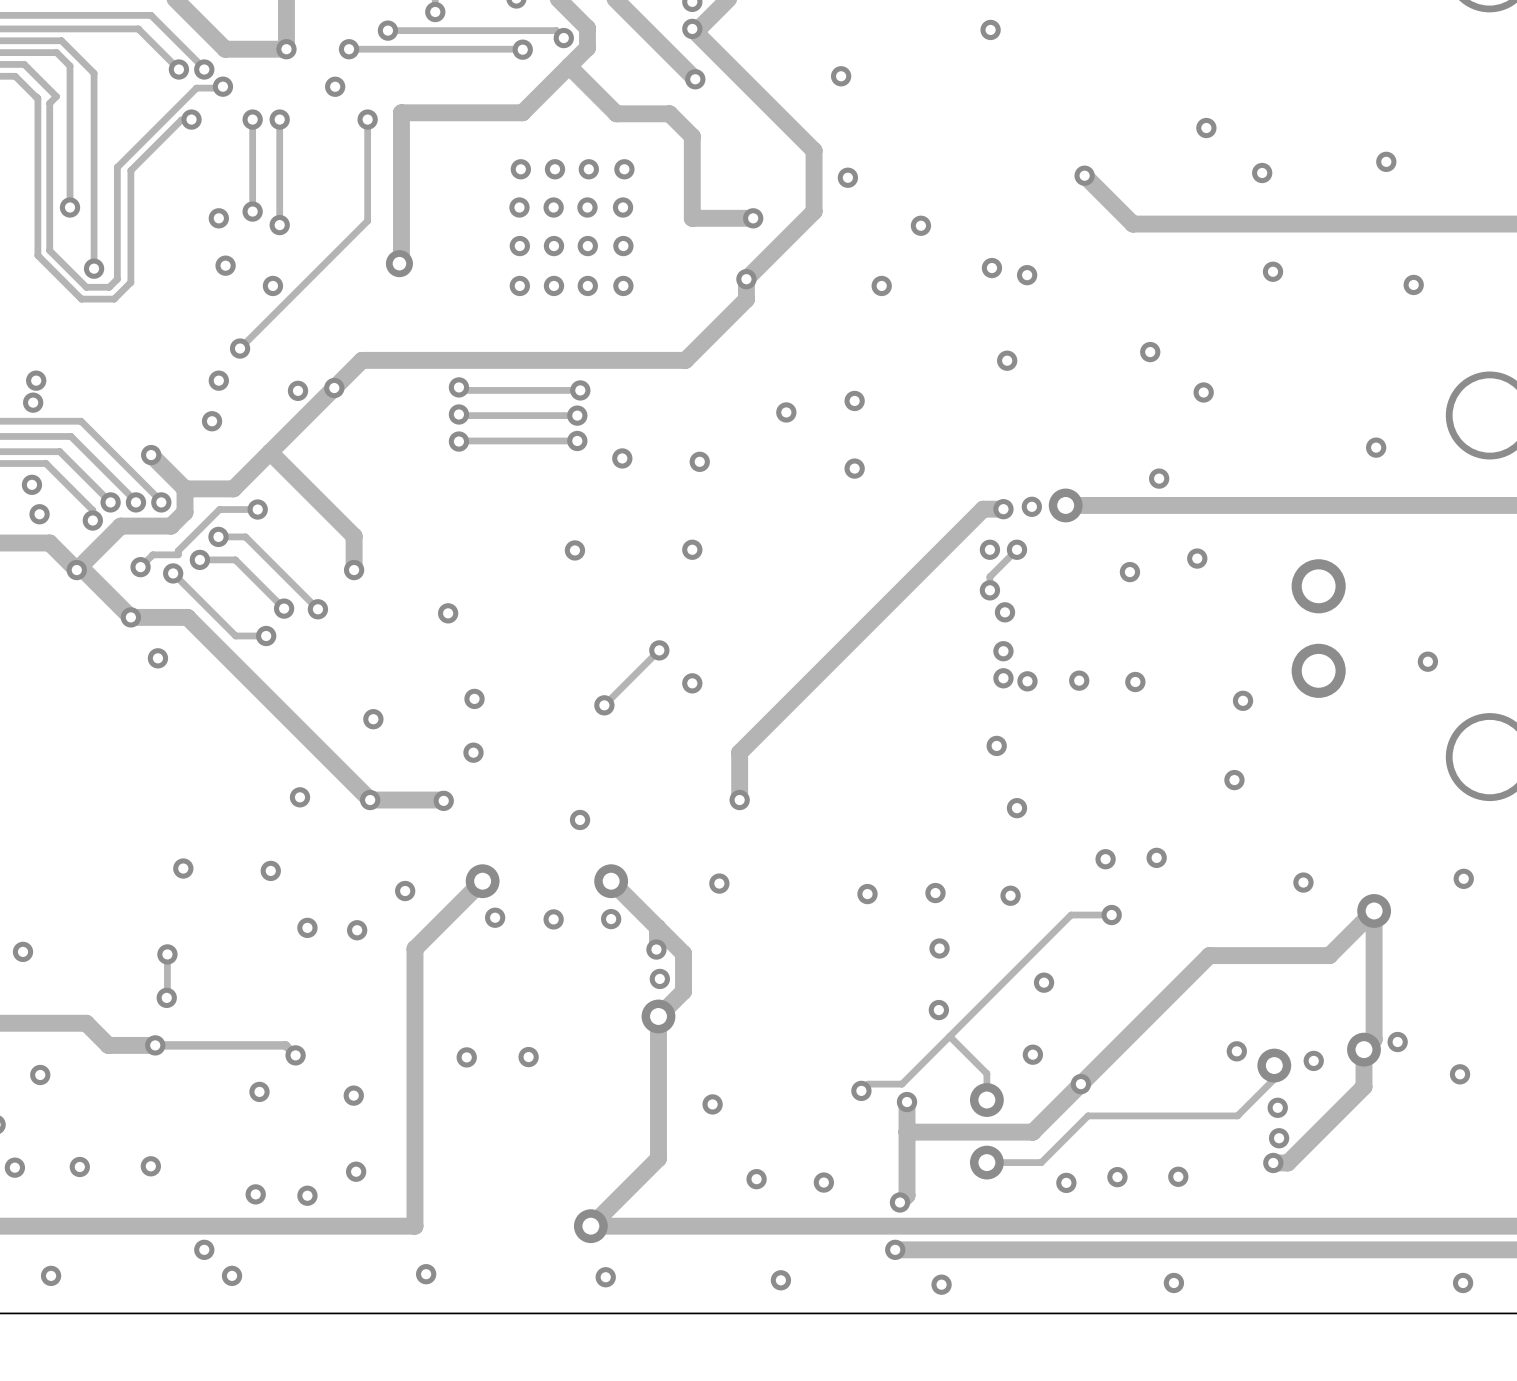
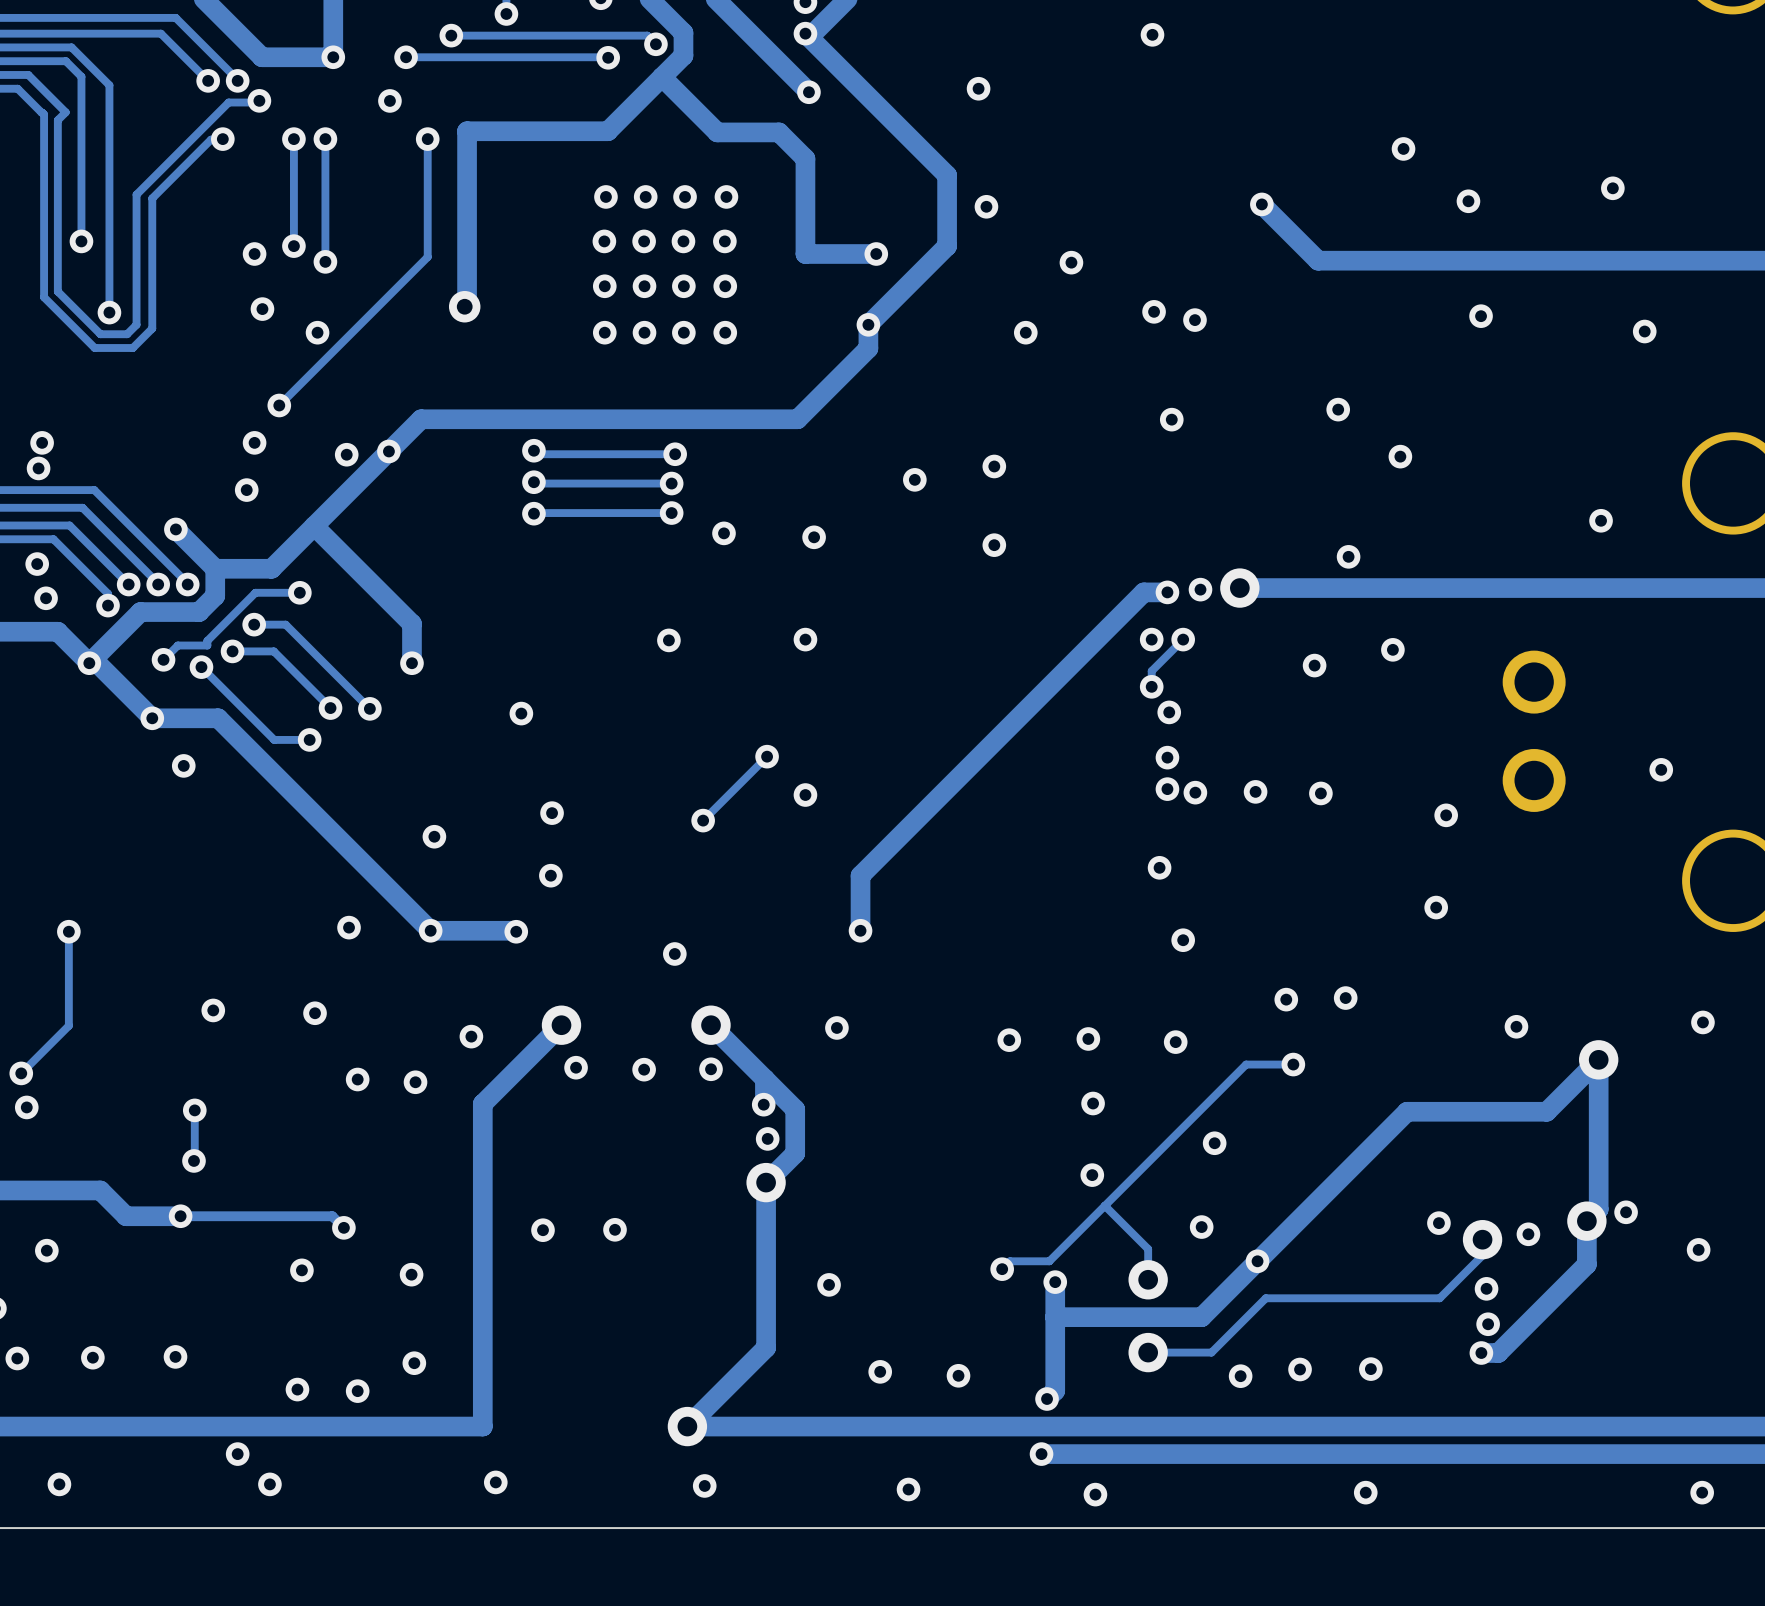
track: none -> (68, 931) (68, 1025) (21, 1073)
via: none -> (68, 931)
via: none -> (21, 1073)

